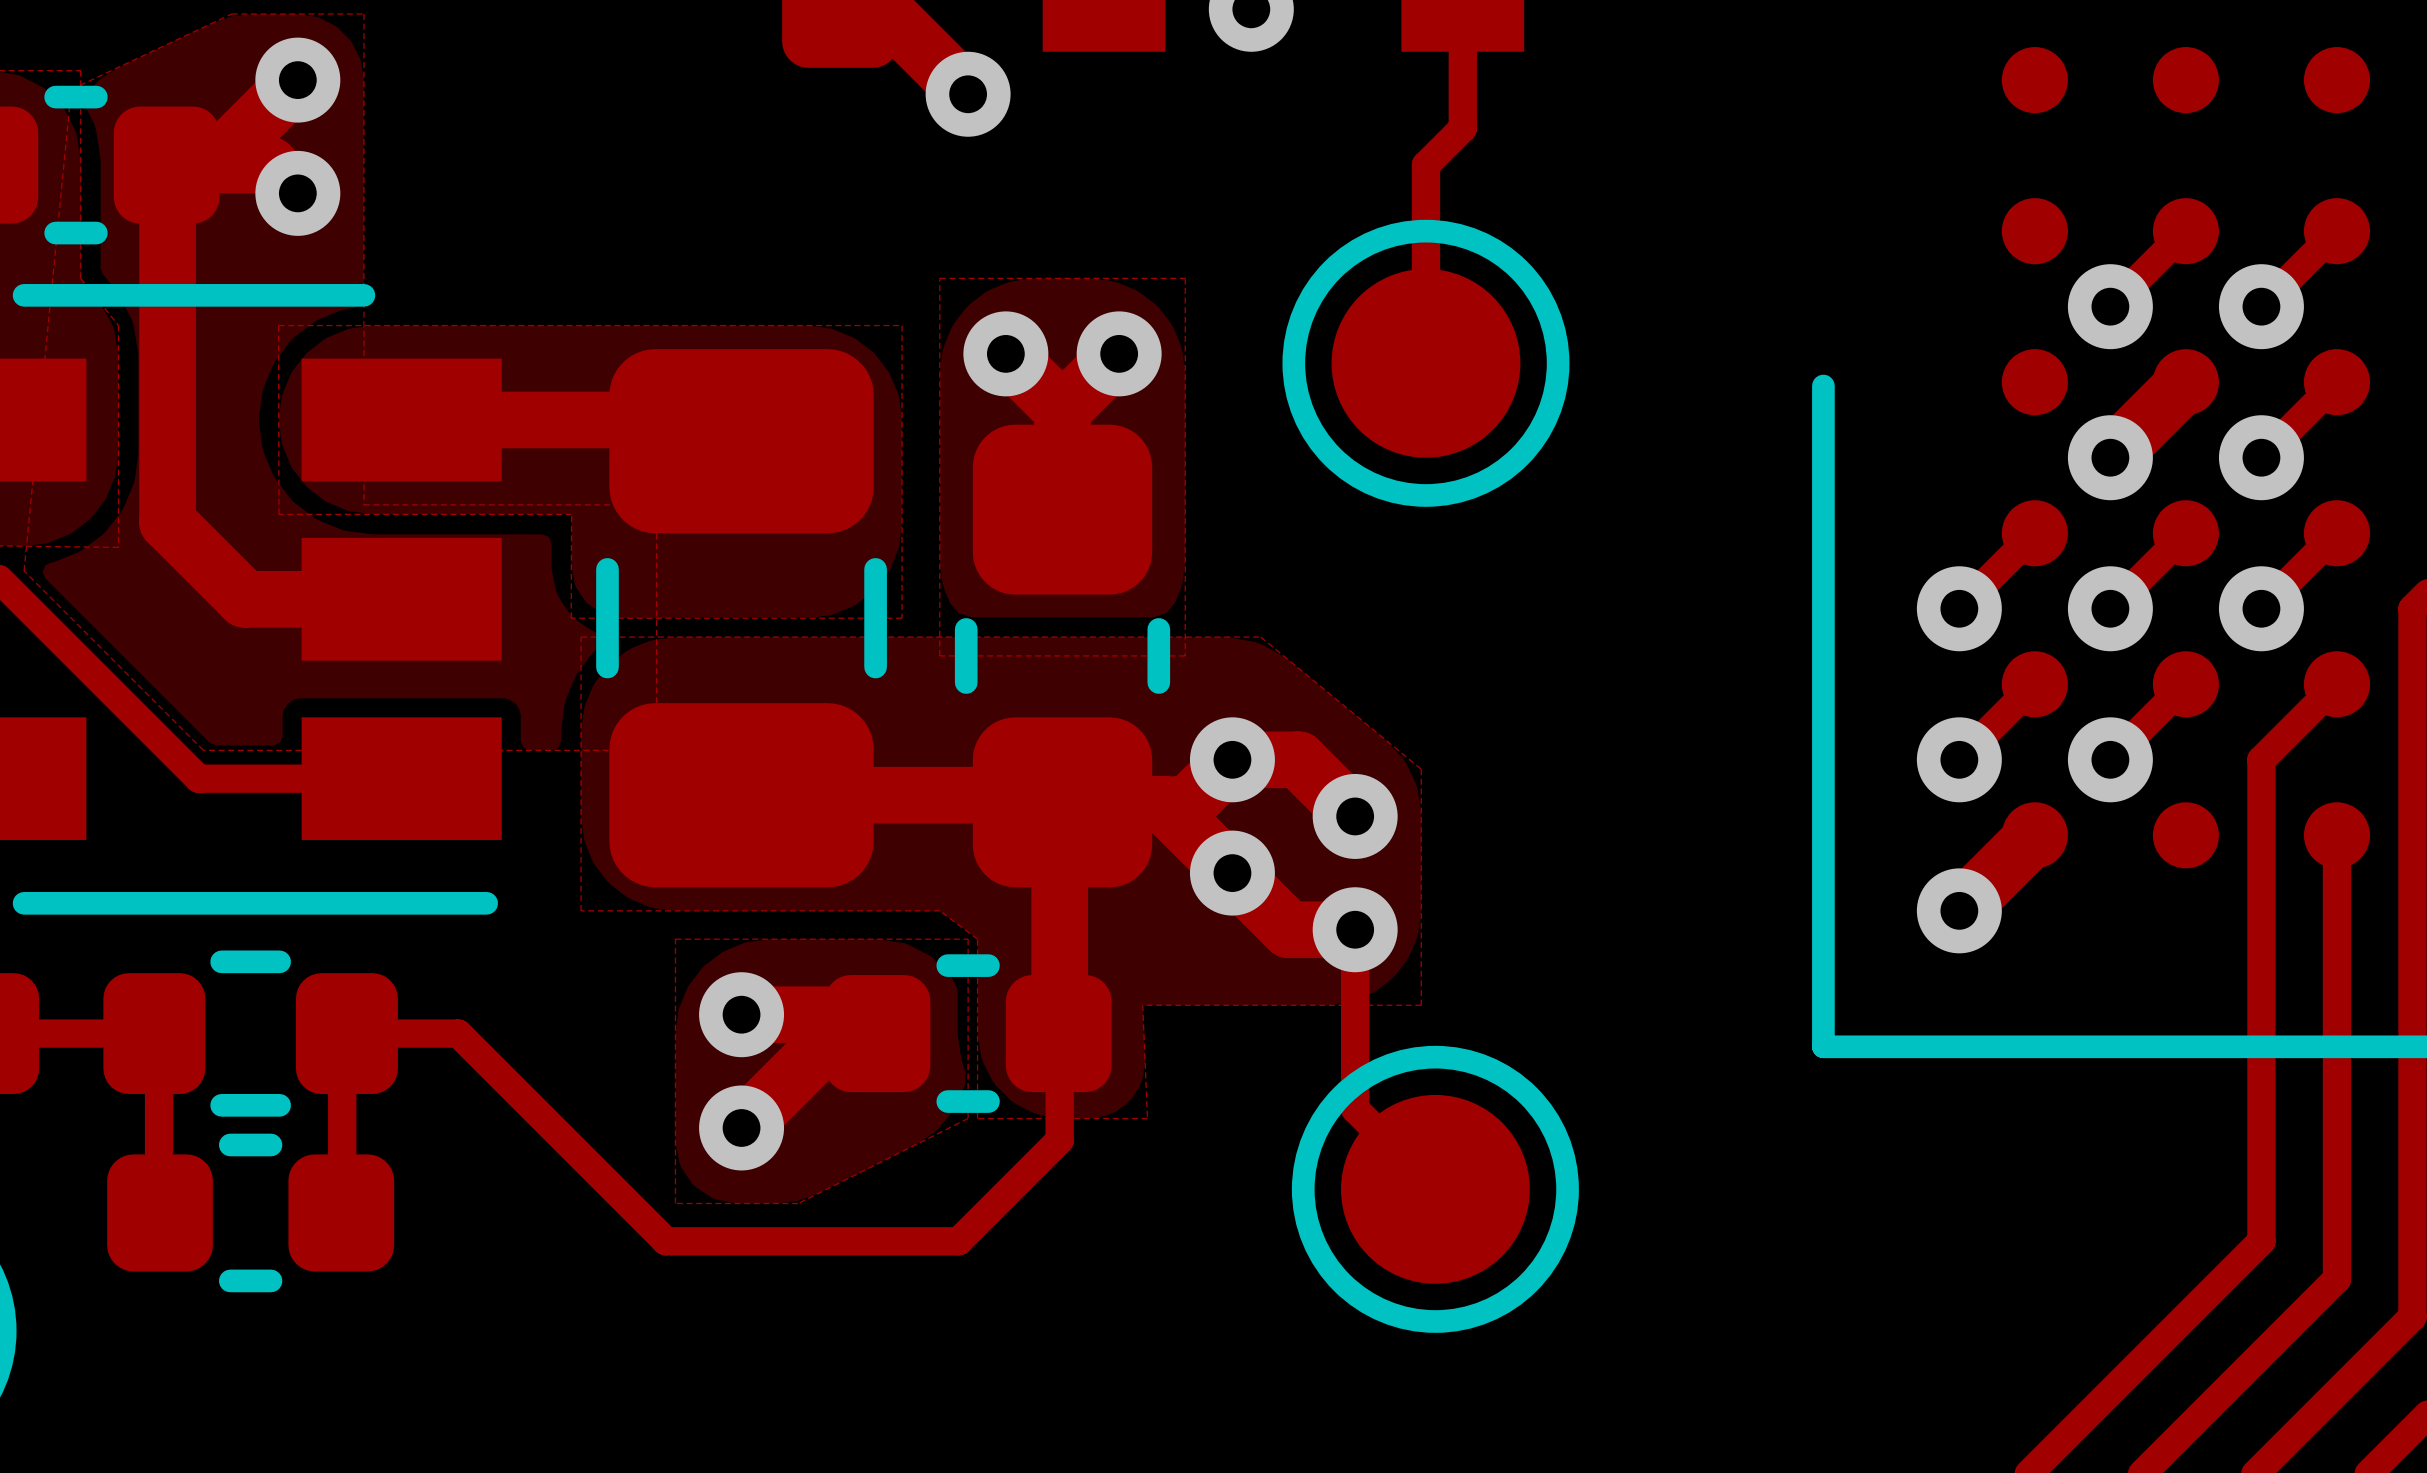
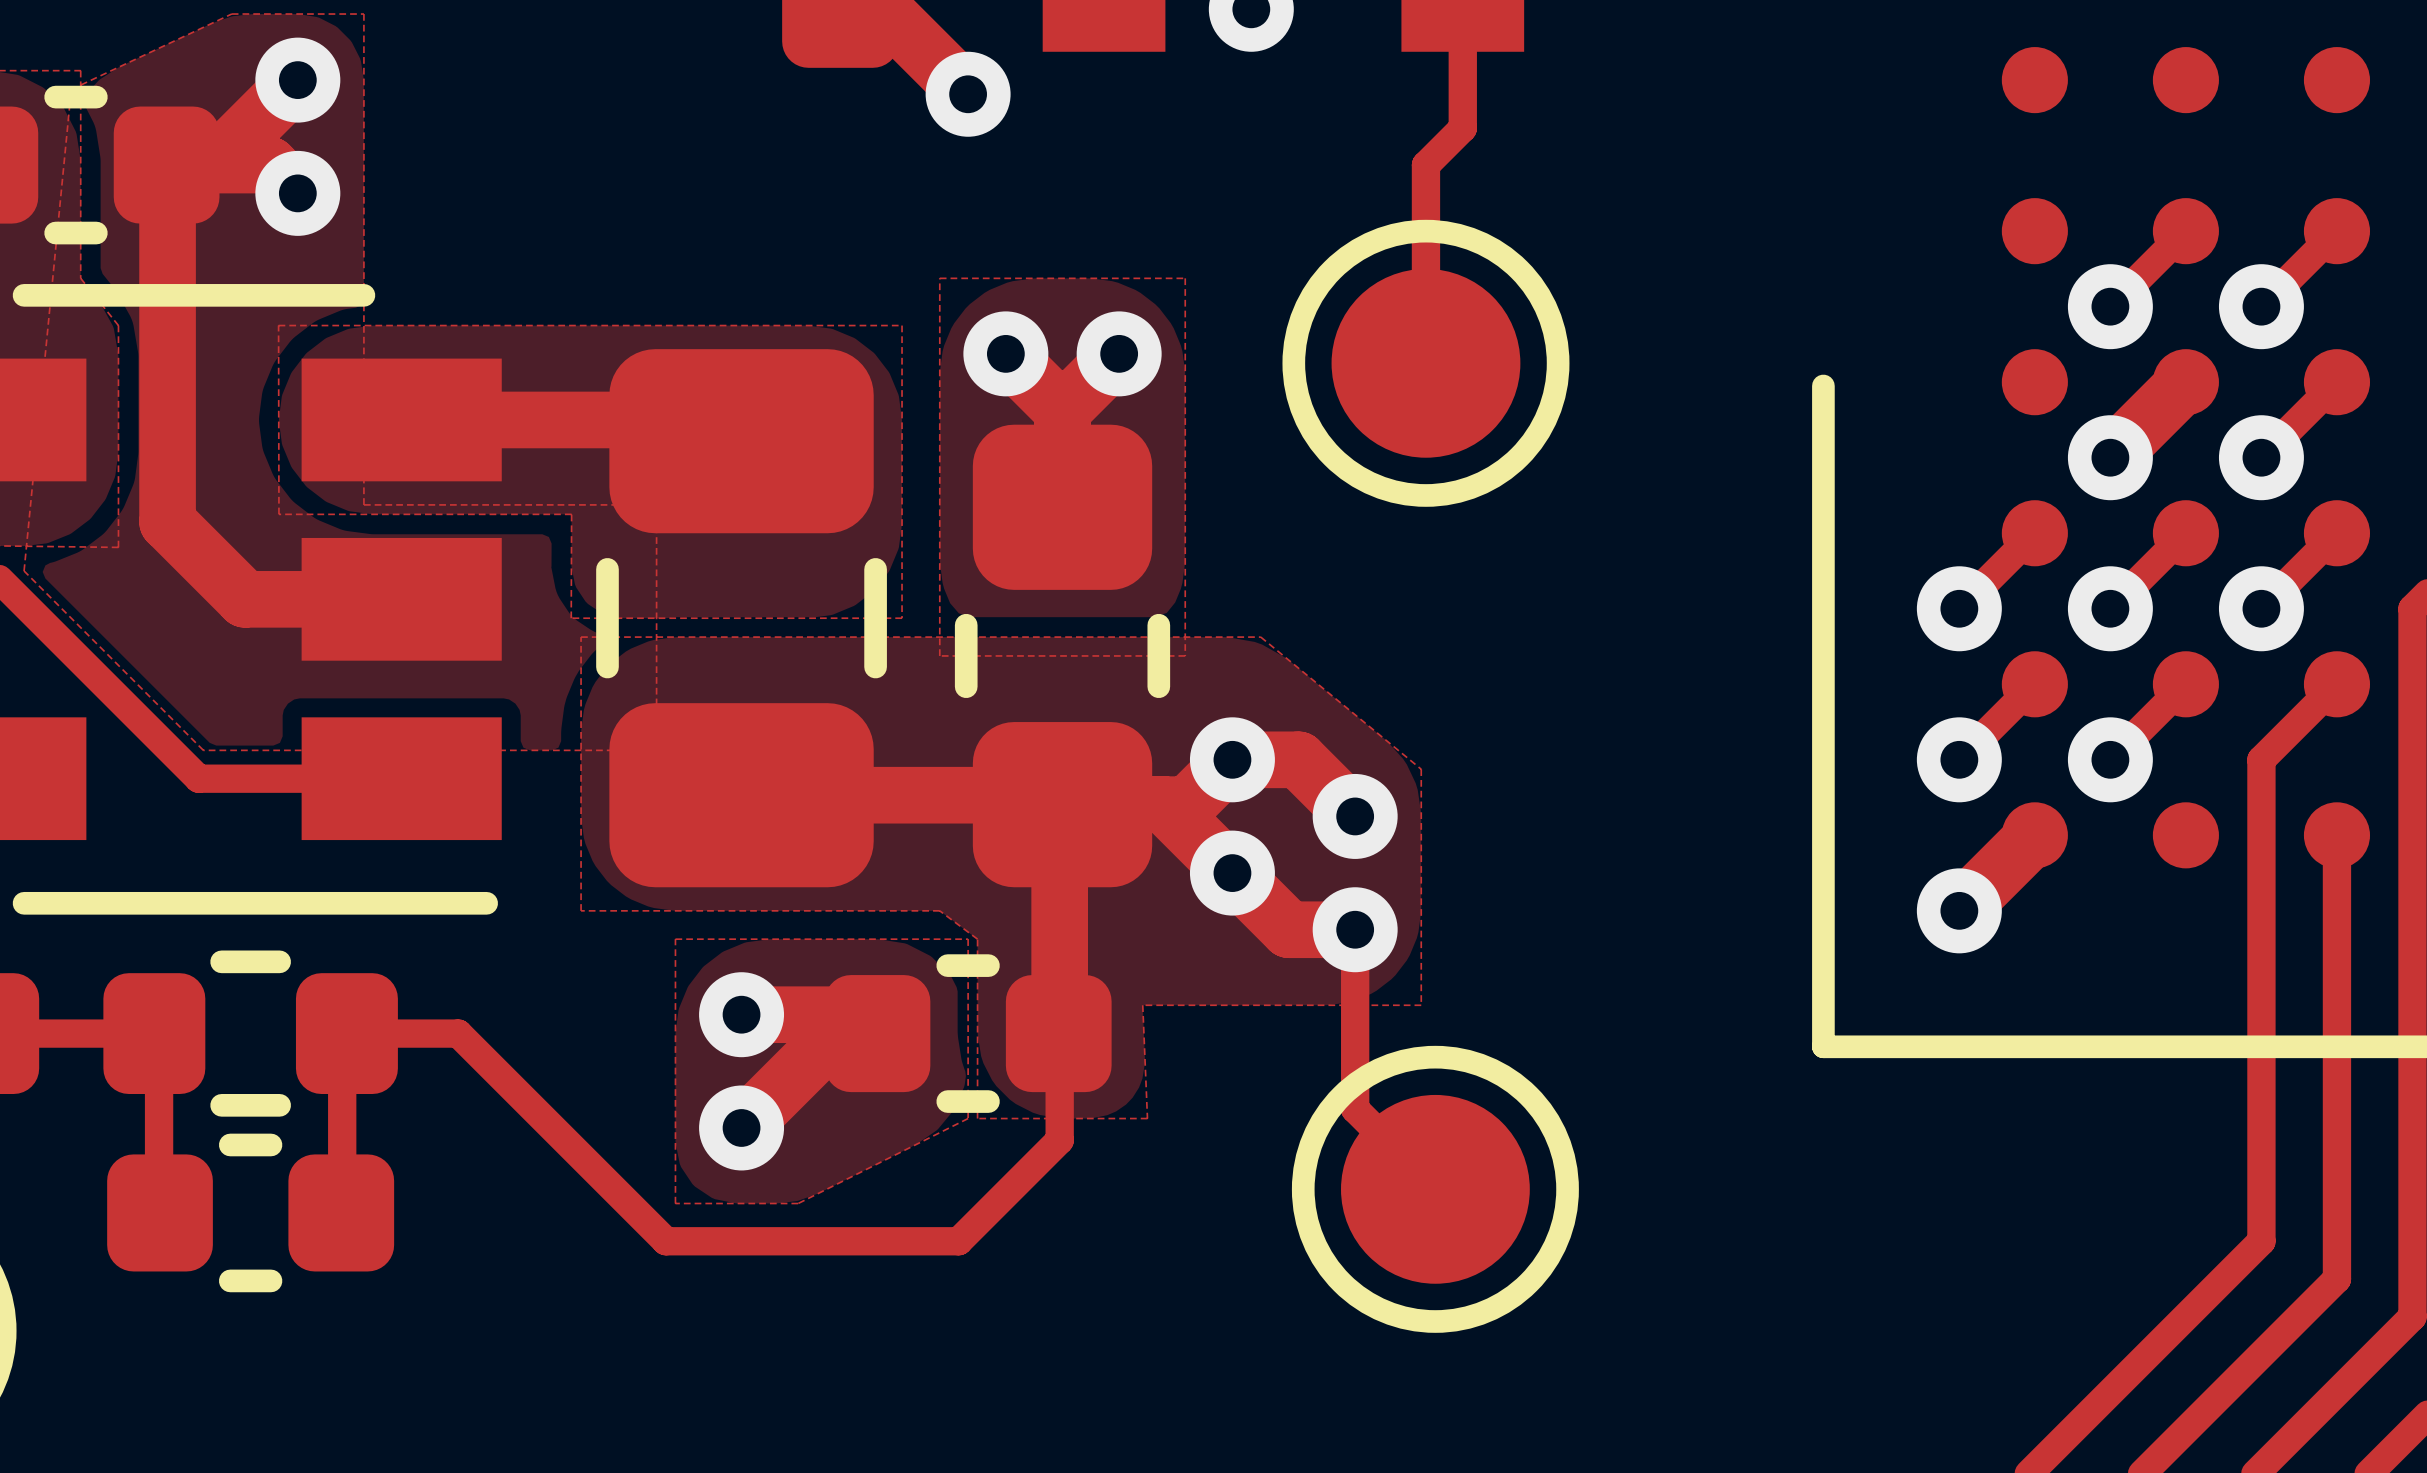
part footprint: [954, 424, 1171, 888] -> [954, 424, 1171, 888]

